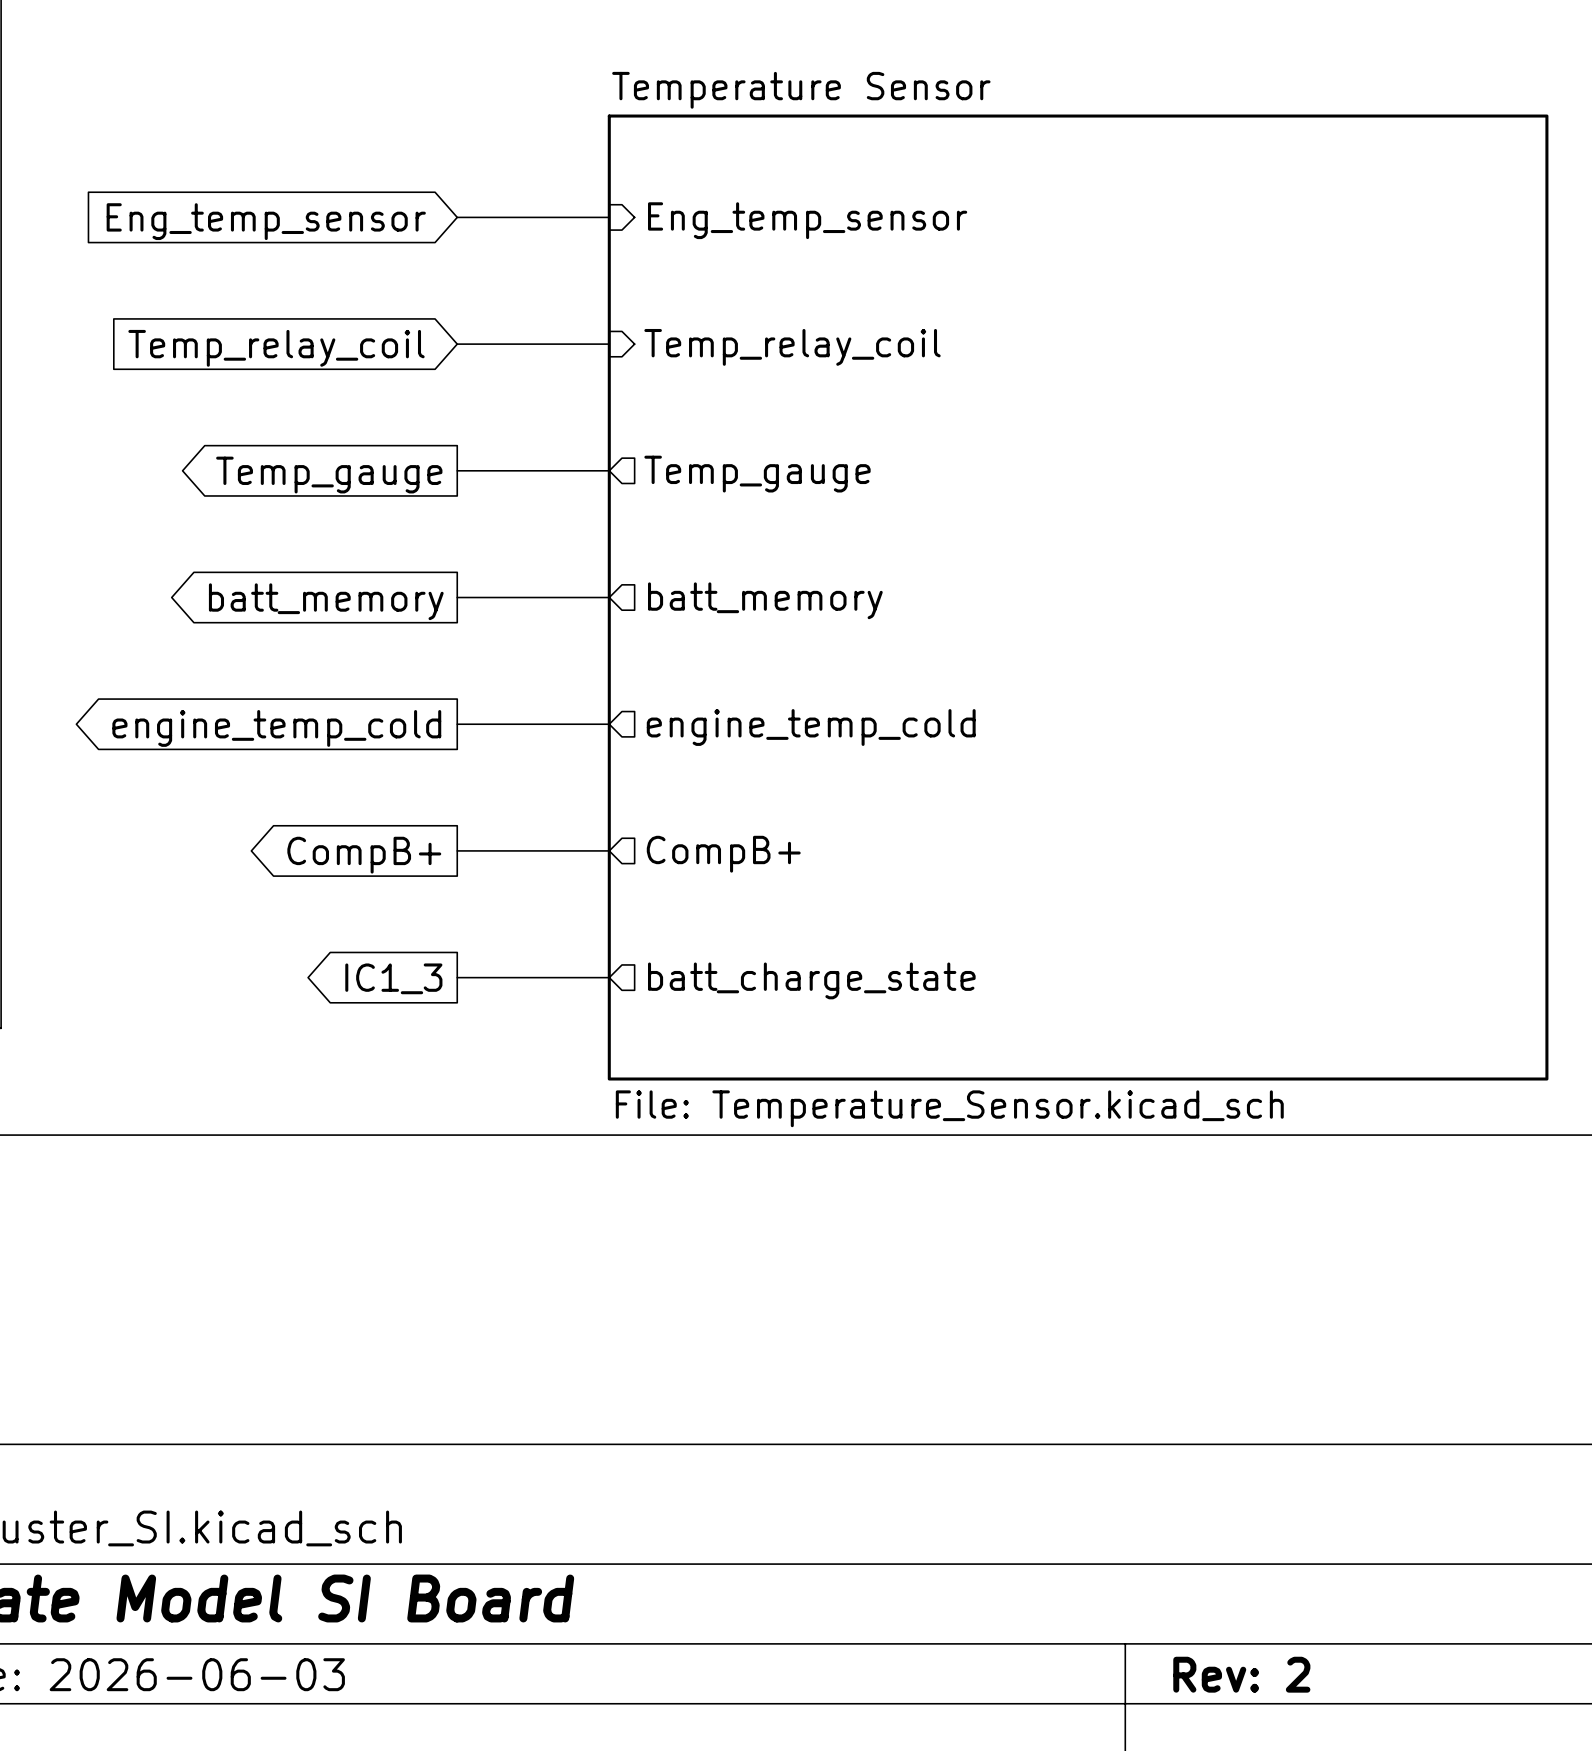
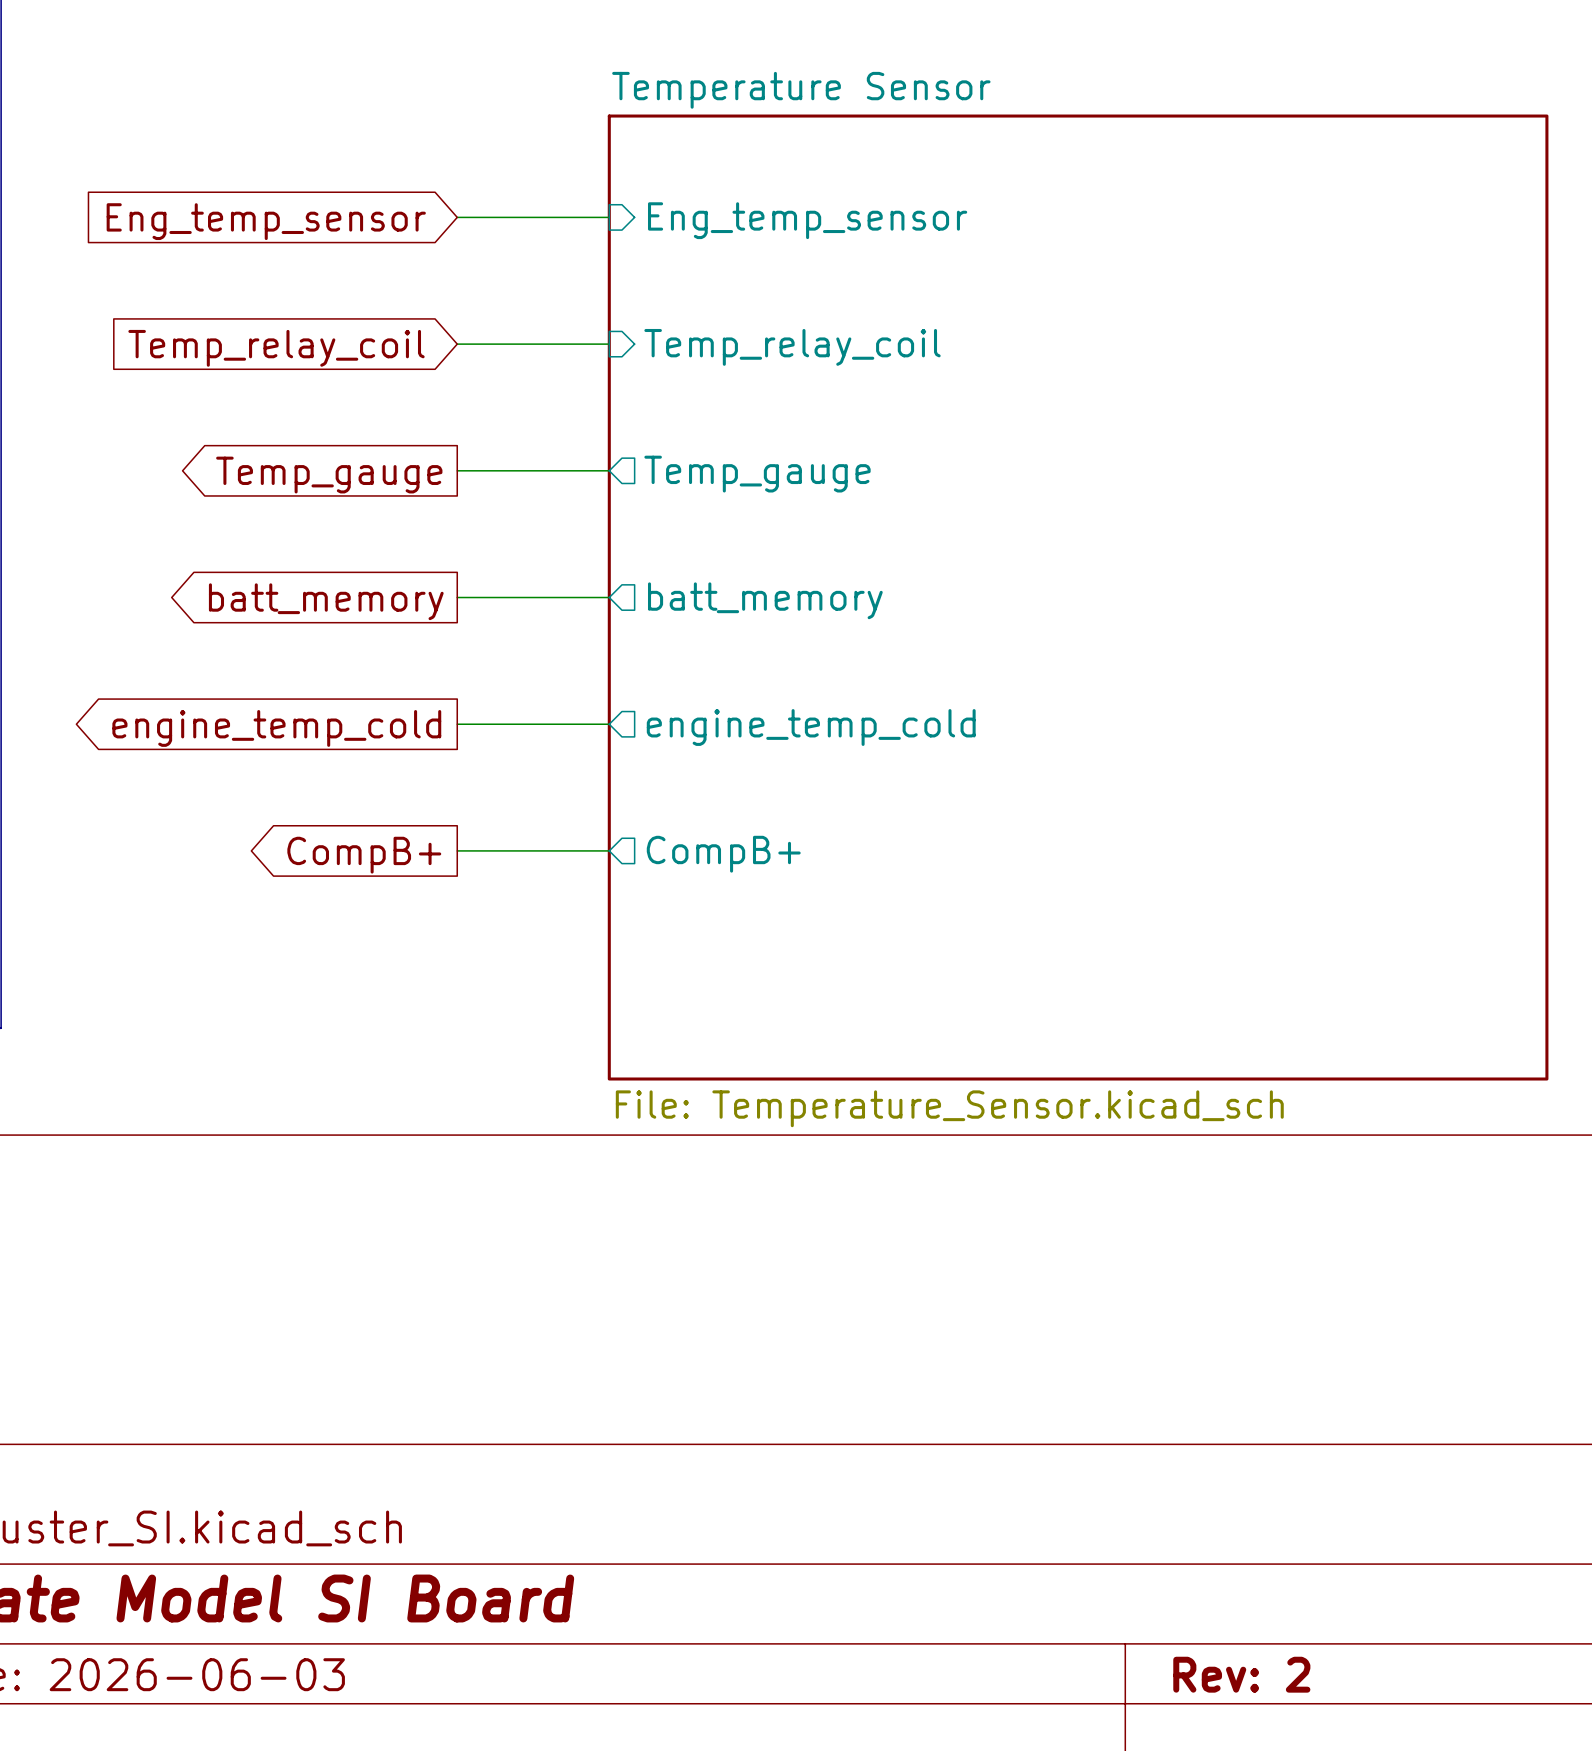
wire: (457, 977) (609, 977) -> none
global label: IC1_3 (393, 978) -> none
sheet pin: batt_charge_state (811, 980) -> none

